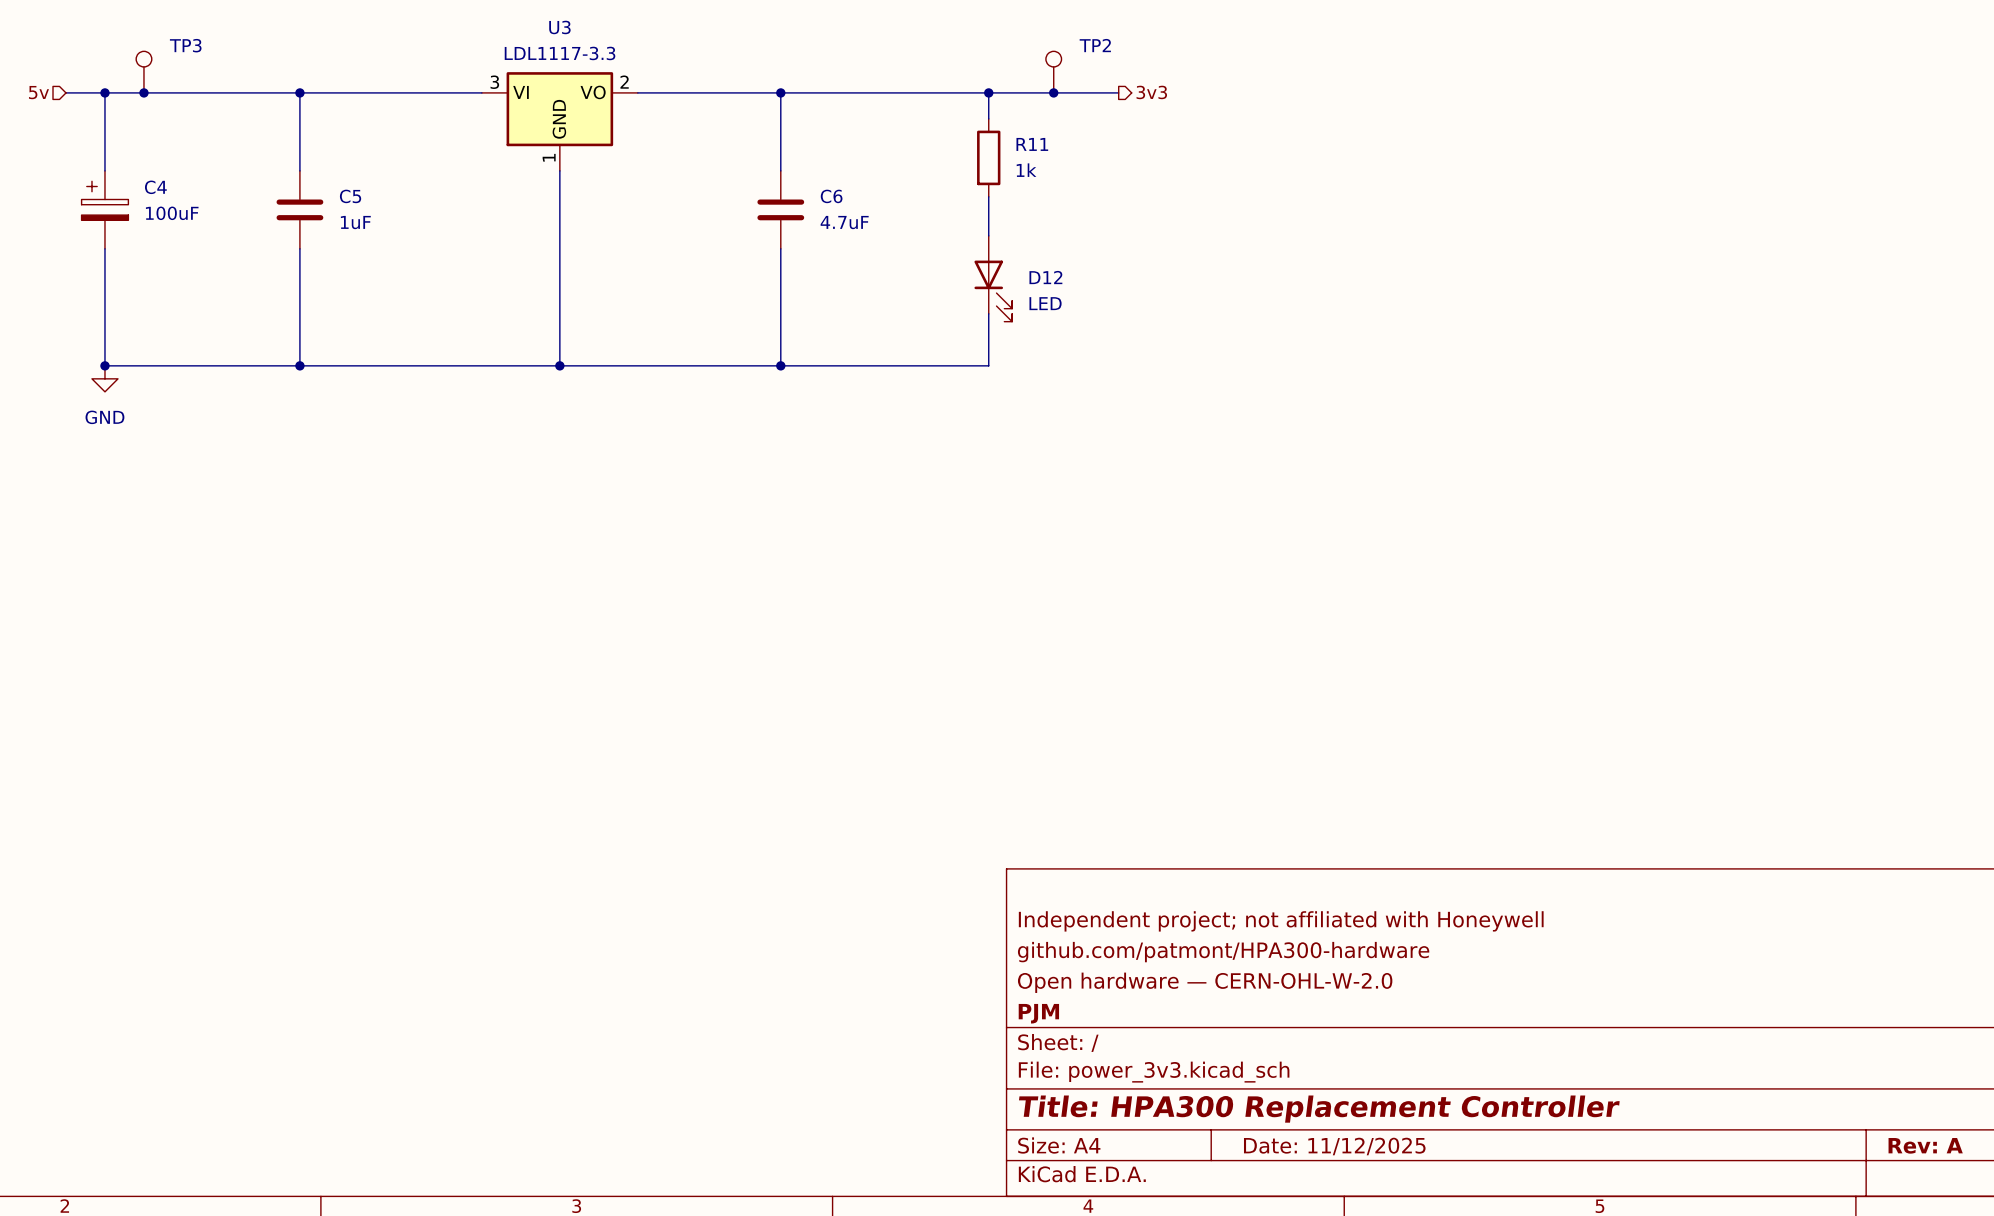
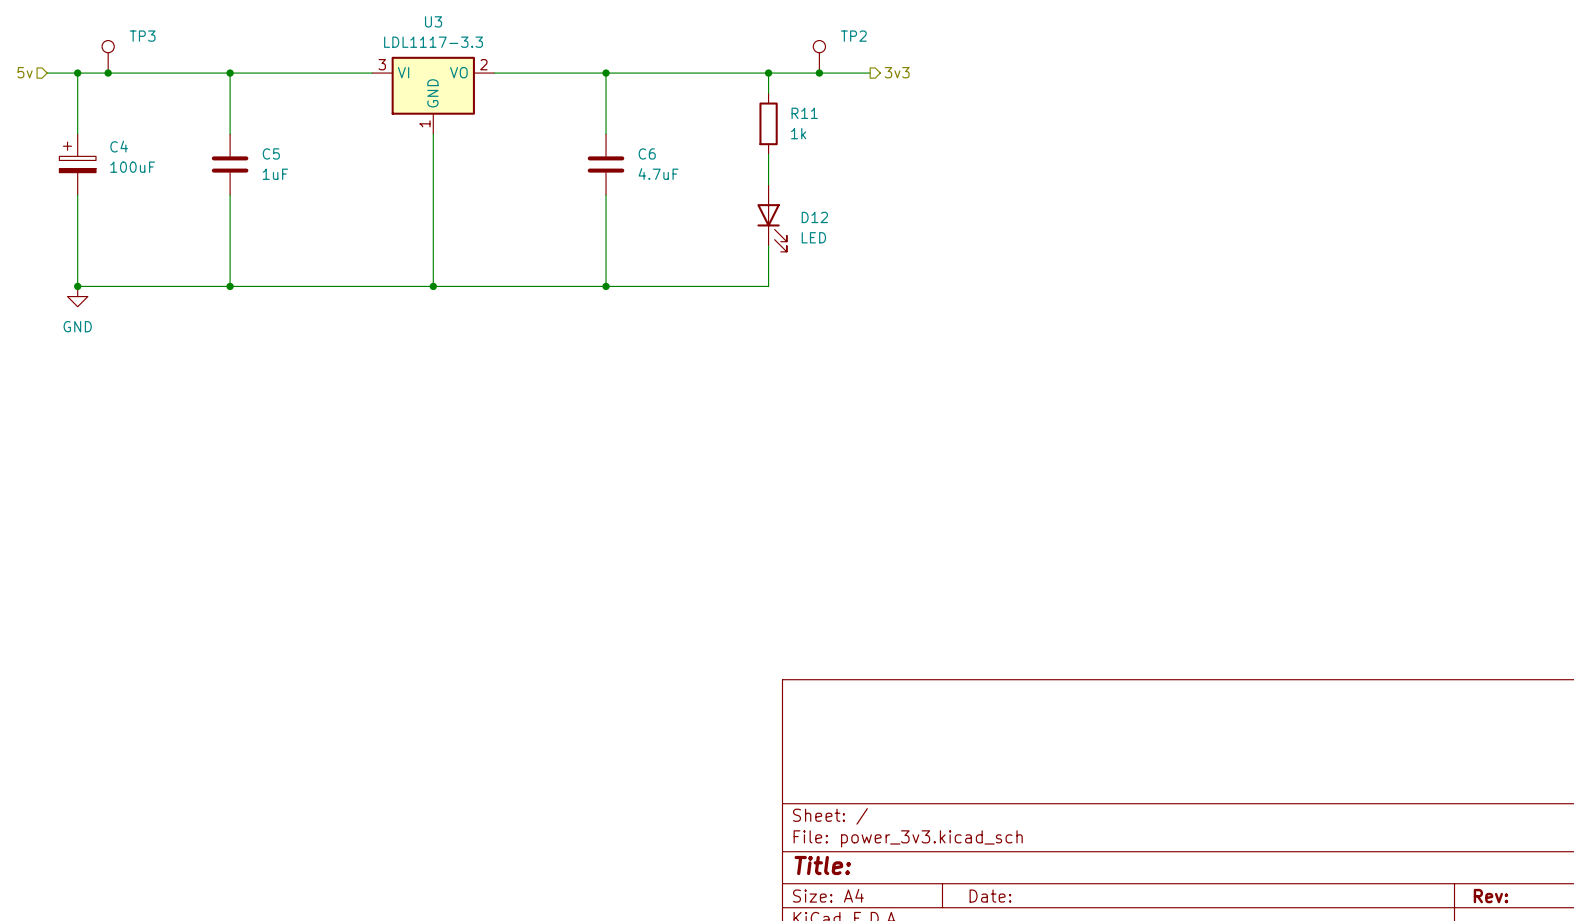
title block: Independent project; not affiliated with Honeywell (1281, 921) -> none
title block: github.com/patmont/HPA300-hardware (1223, 952) -> none
title block: Open hardware — CERN-OHL-W-2.0 (1205, 982) -> none
title block: PJM (1038, 1013) -> none
title block: Title: HPA300 Replacement Controller (1319, 1109) -> Title: (822, 865)
title block: Rev: A (1925, 1145) -> Rev: (1490, 896)
title block: Date: 11/12/2025 (1334, 1146) -> Date: (990, 896)

